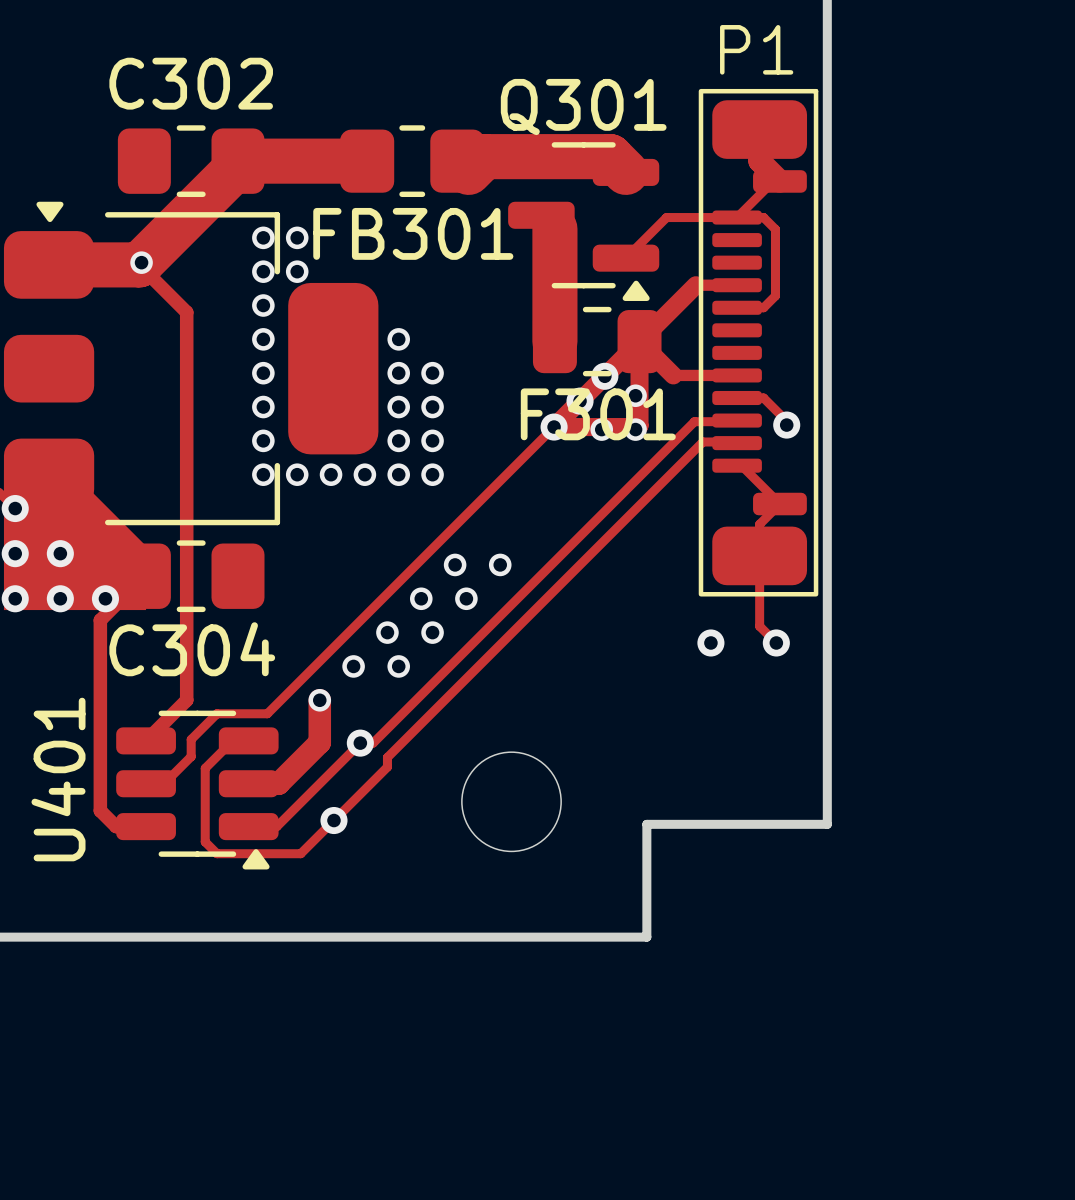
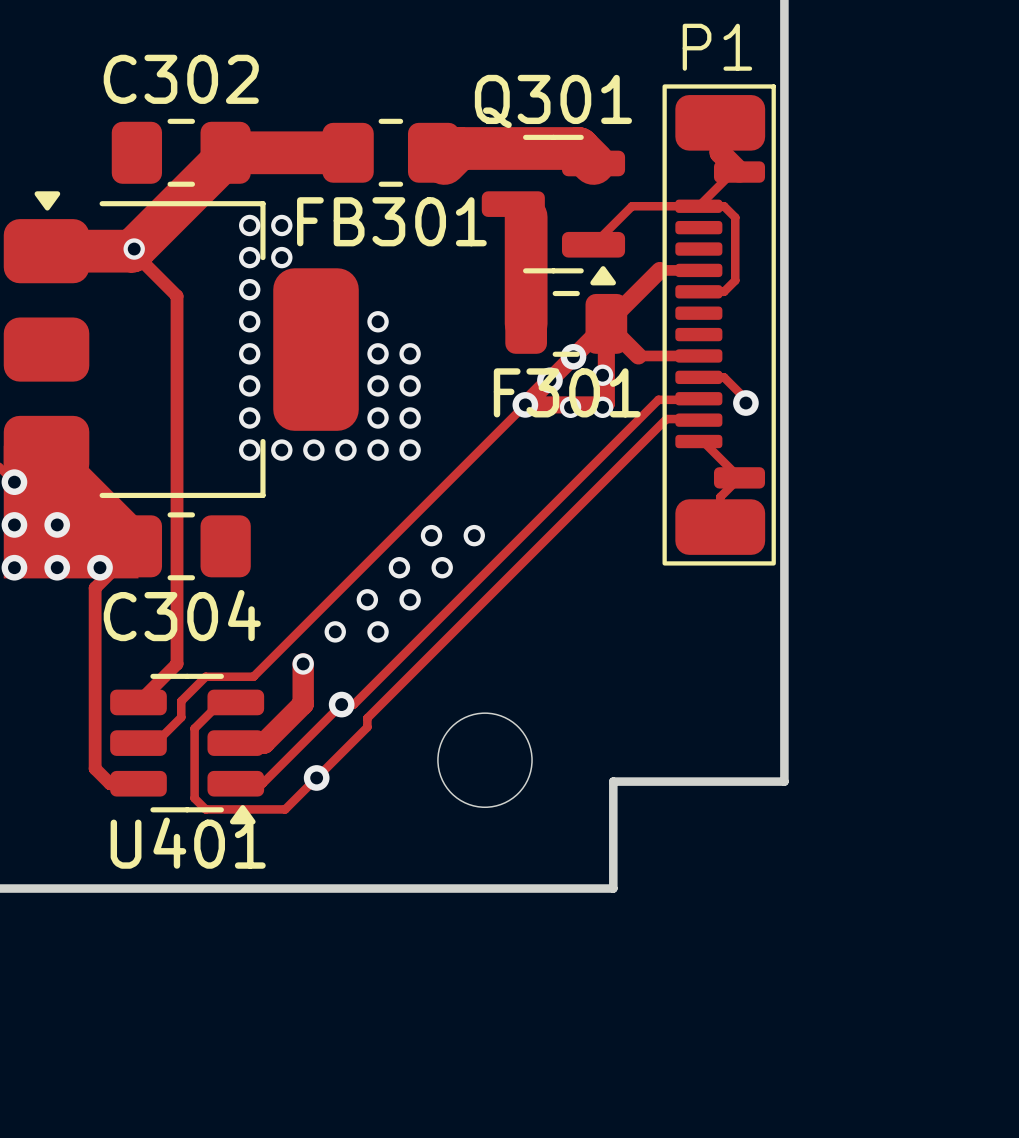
track: (759, 555) (759, 626) (776, 642) -> none
via: (710, 642) -> none
via: (776, 642) -> none
U401 name rotation: 0° (58, 779) -> 90° clockwise (188, 843)

